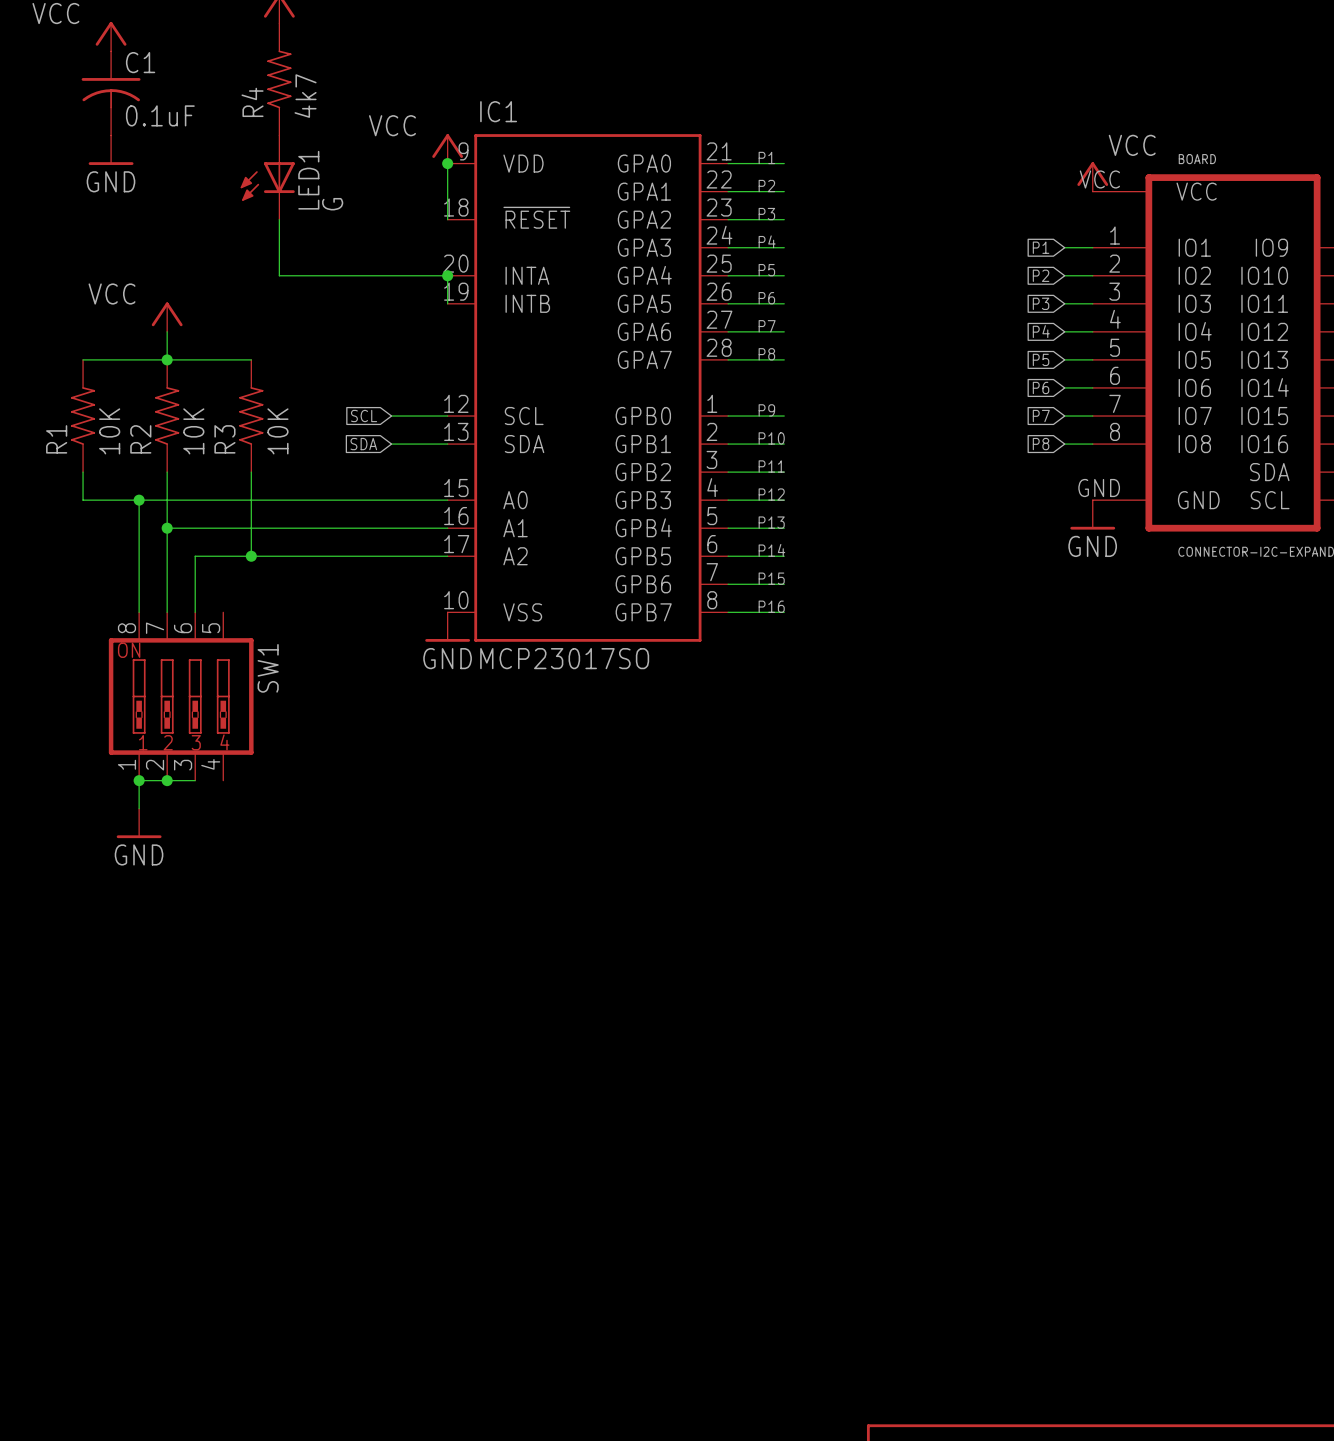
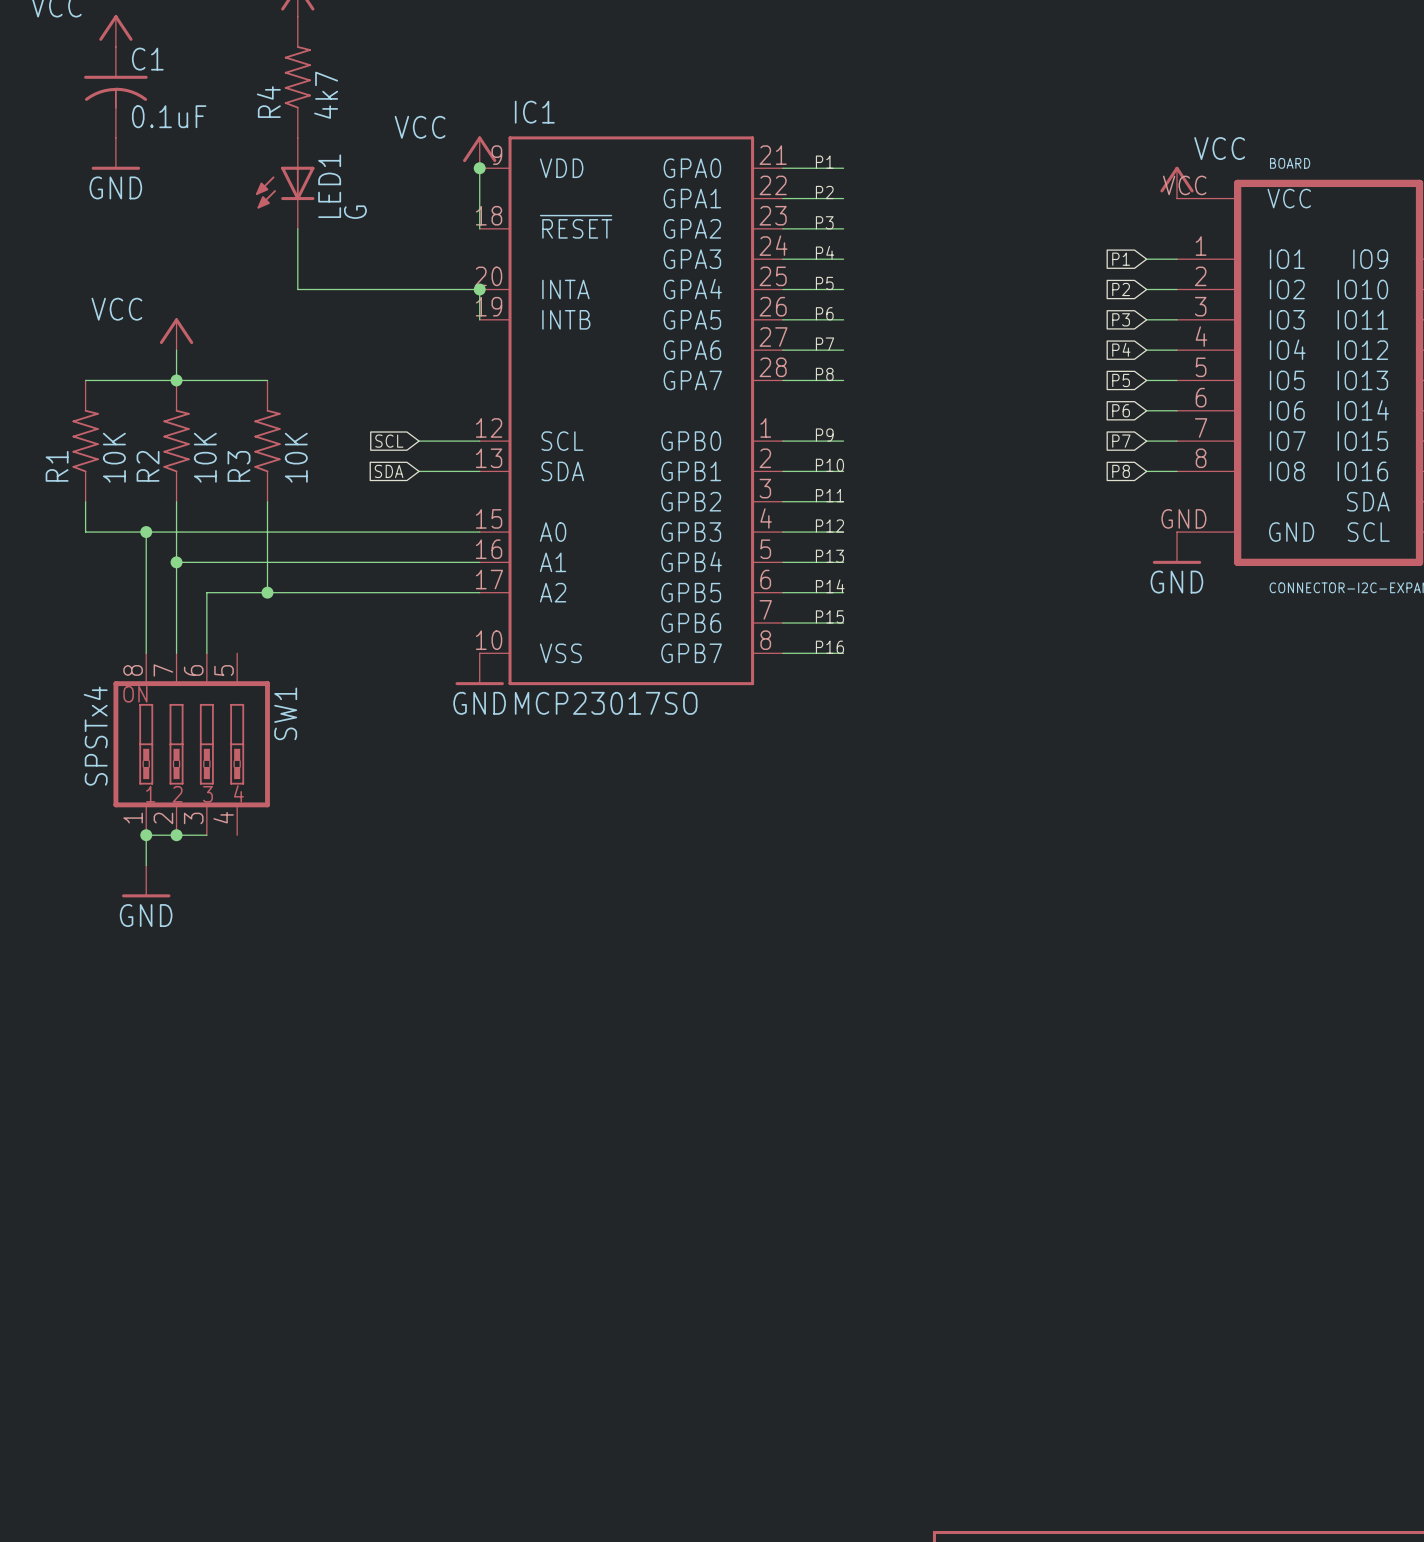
SW1 value: none -> SPSTx4 (95, 736)

